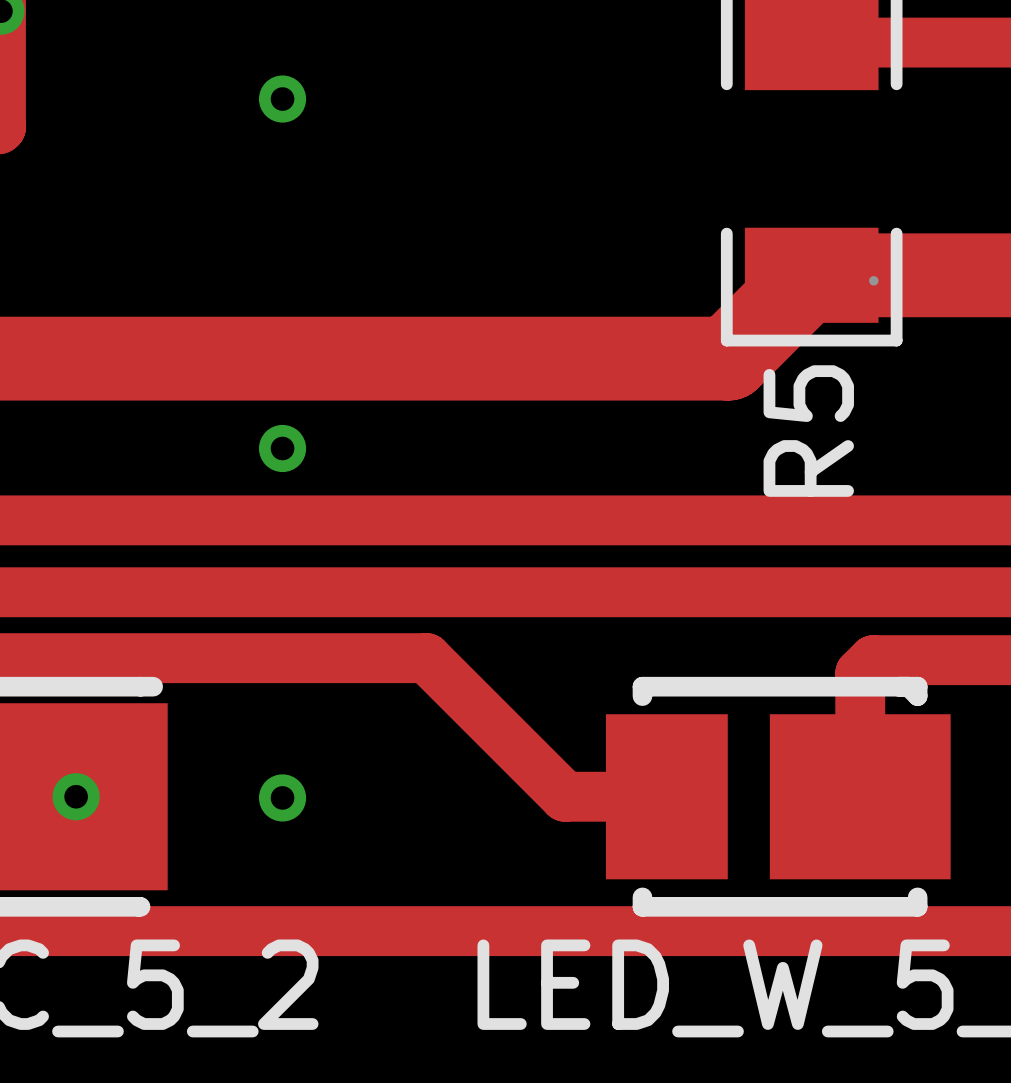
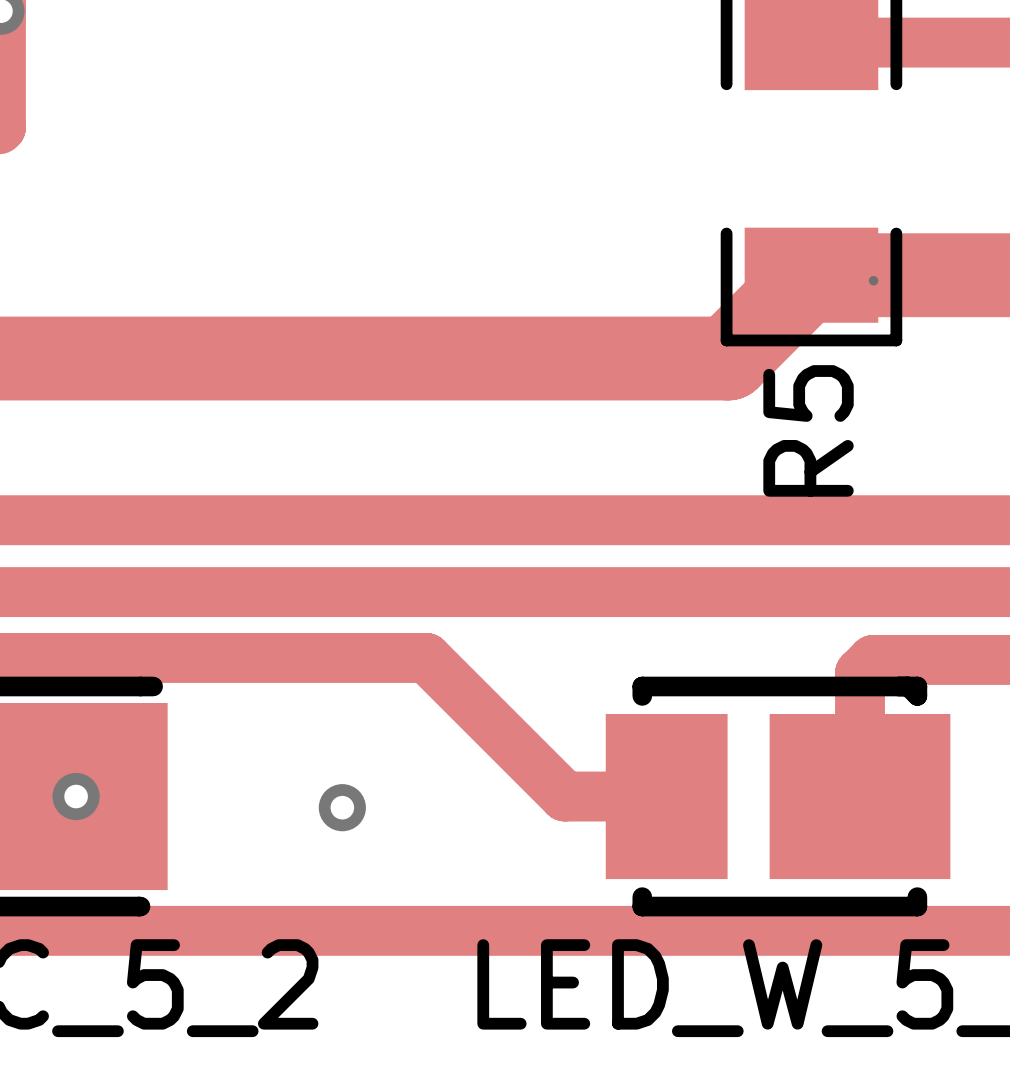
via: (282, 99) -> none
via: (282, 448) -> none
via position: (282, 797) -> (342, 807)

